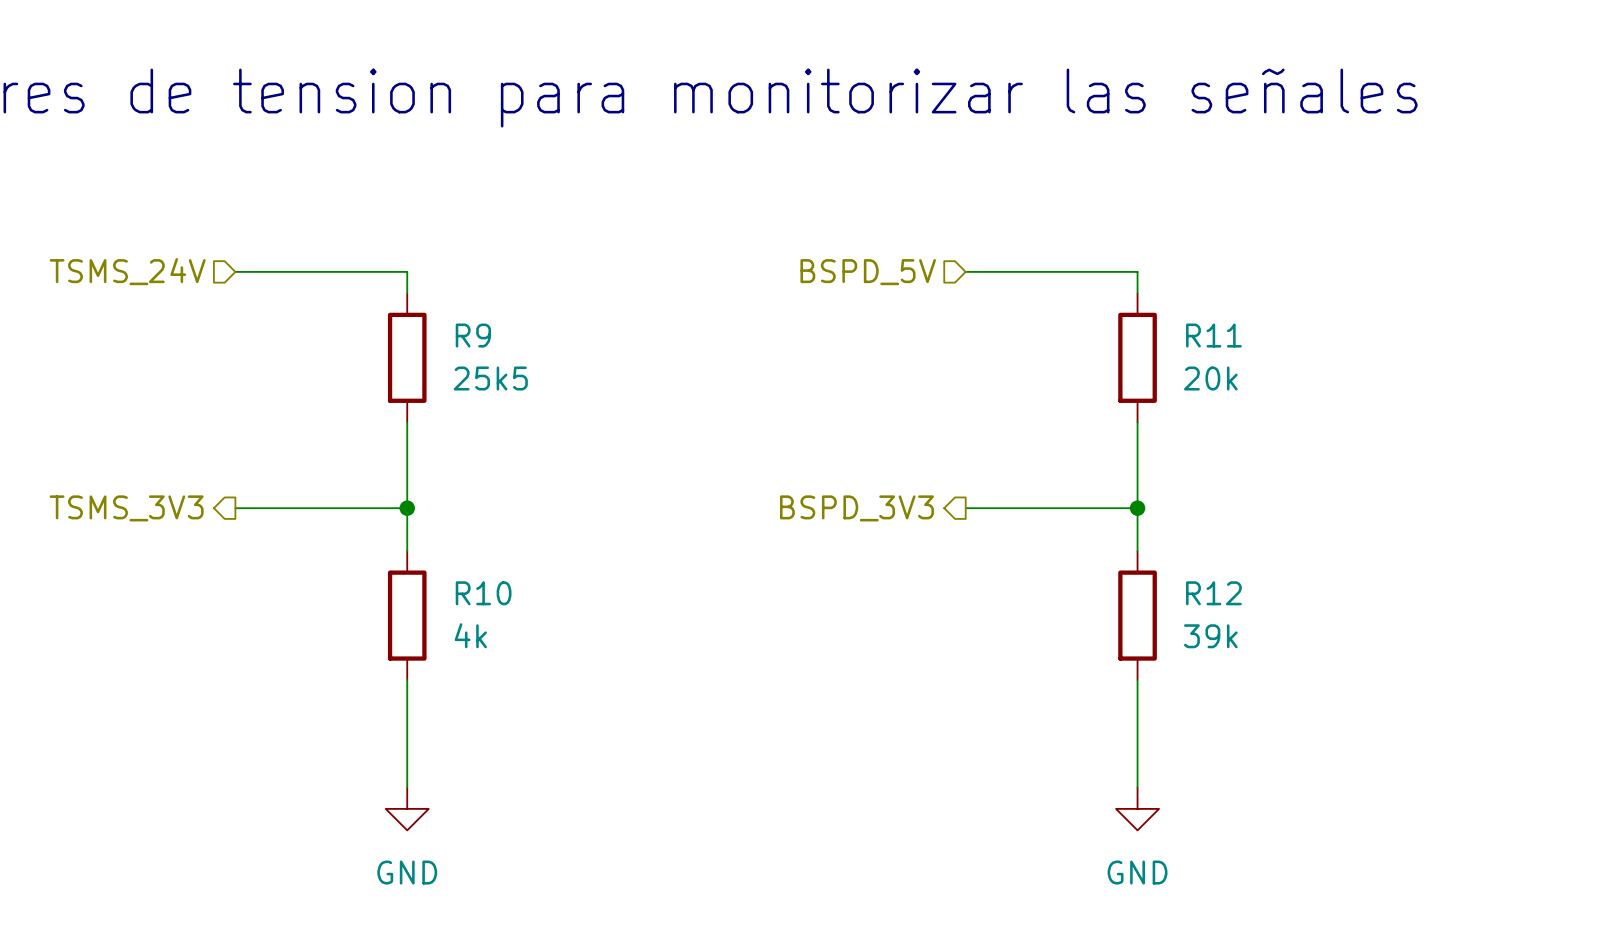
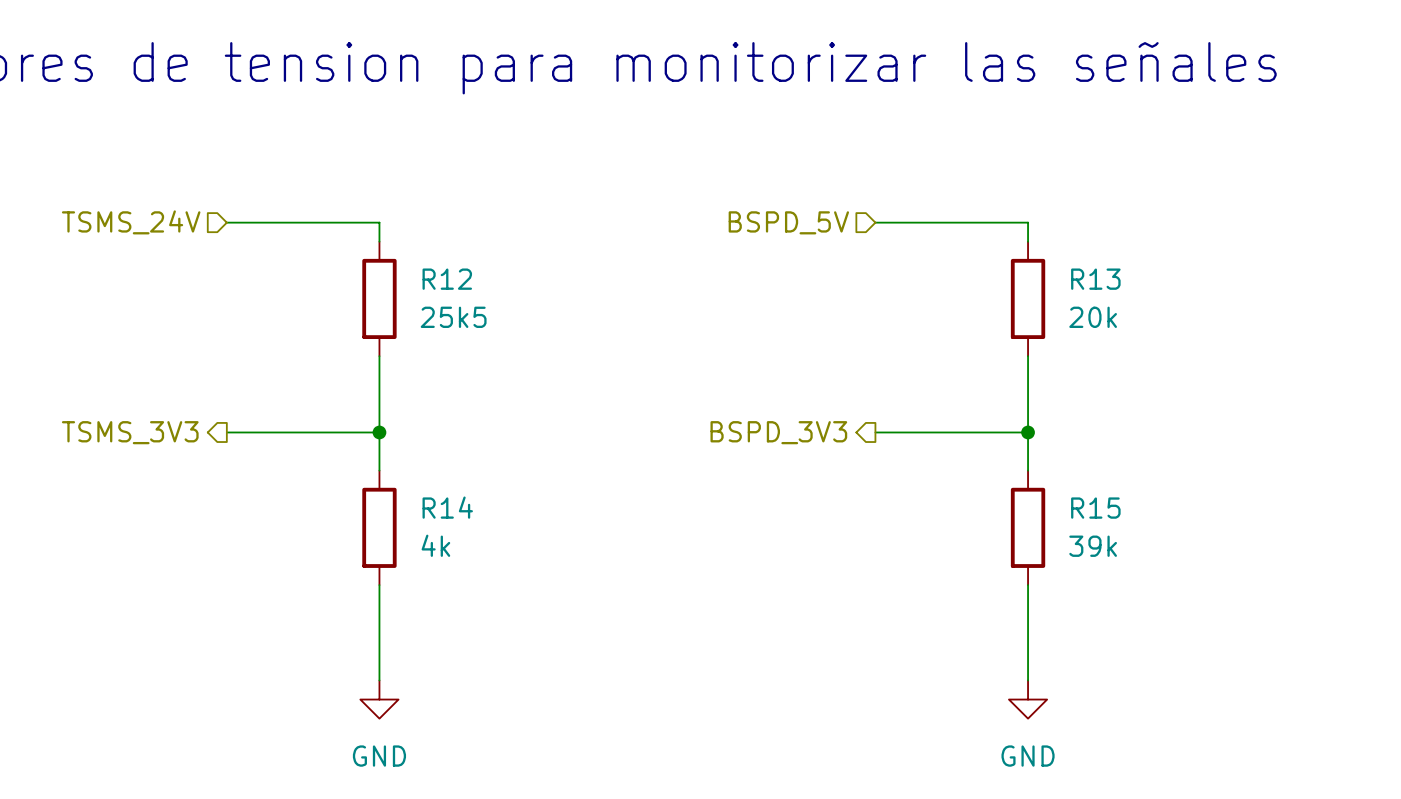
R9 name: R9 (473, 335) -> R12 (447, 279)
R11 name: R11 (1213, 335) -> R13 (1095, 279)
R10 name: R10 (483, 593) -> R14 (447, 507)
R12 name: R12 (1213, 593) -> R15 (1095, 508)

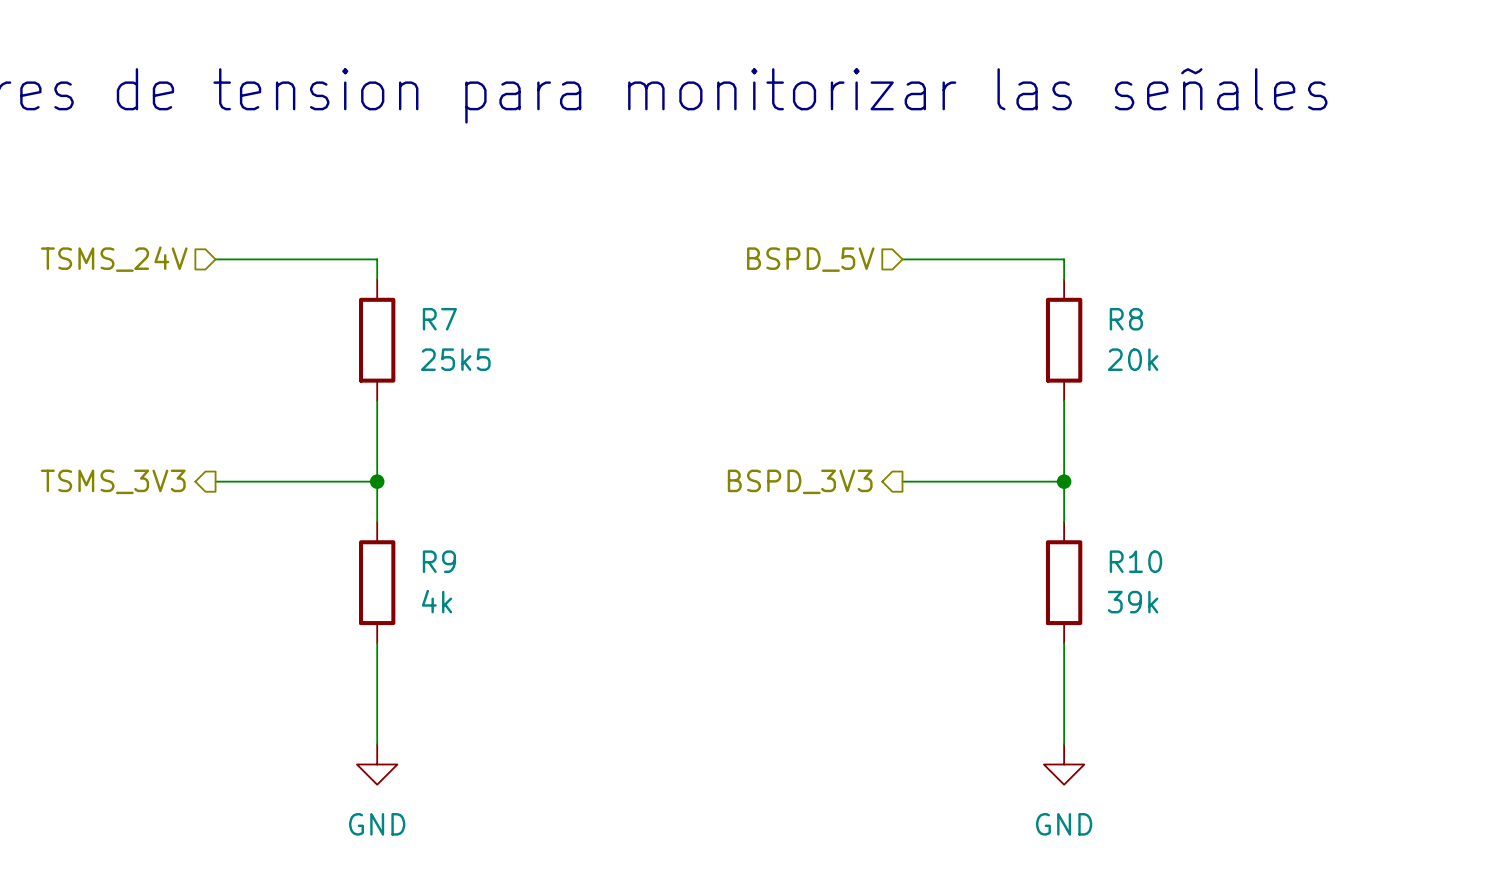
R12 name: R12 (447, 279) -> R7 (439, 319)
R13 name: R13 (1095, 279) -> R8 (1126, 319)
R14 name: R14 (447, 507) -> R9 (439, 561)
R15 name: R15 (1095, 508) -> R10 (1135, 561)

